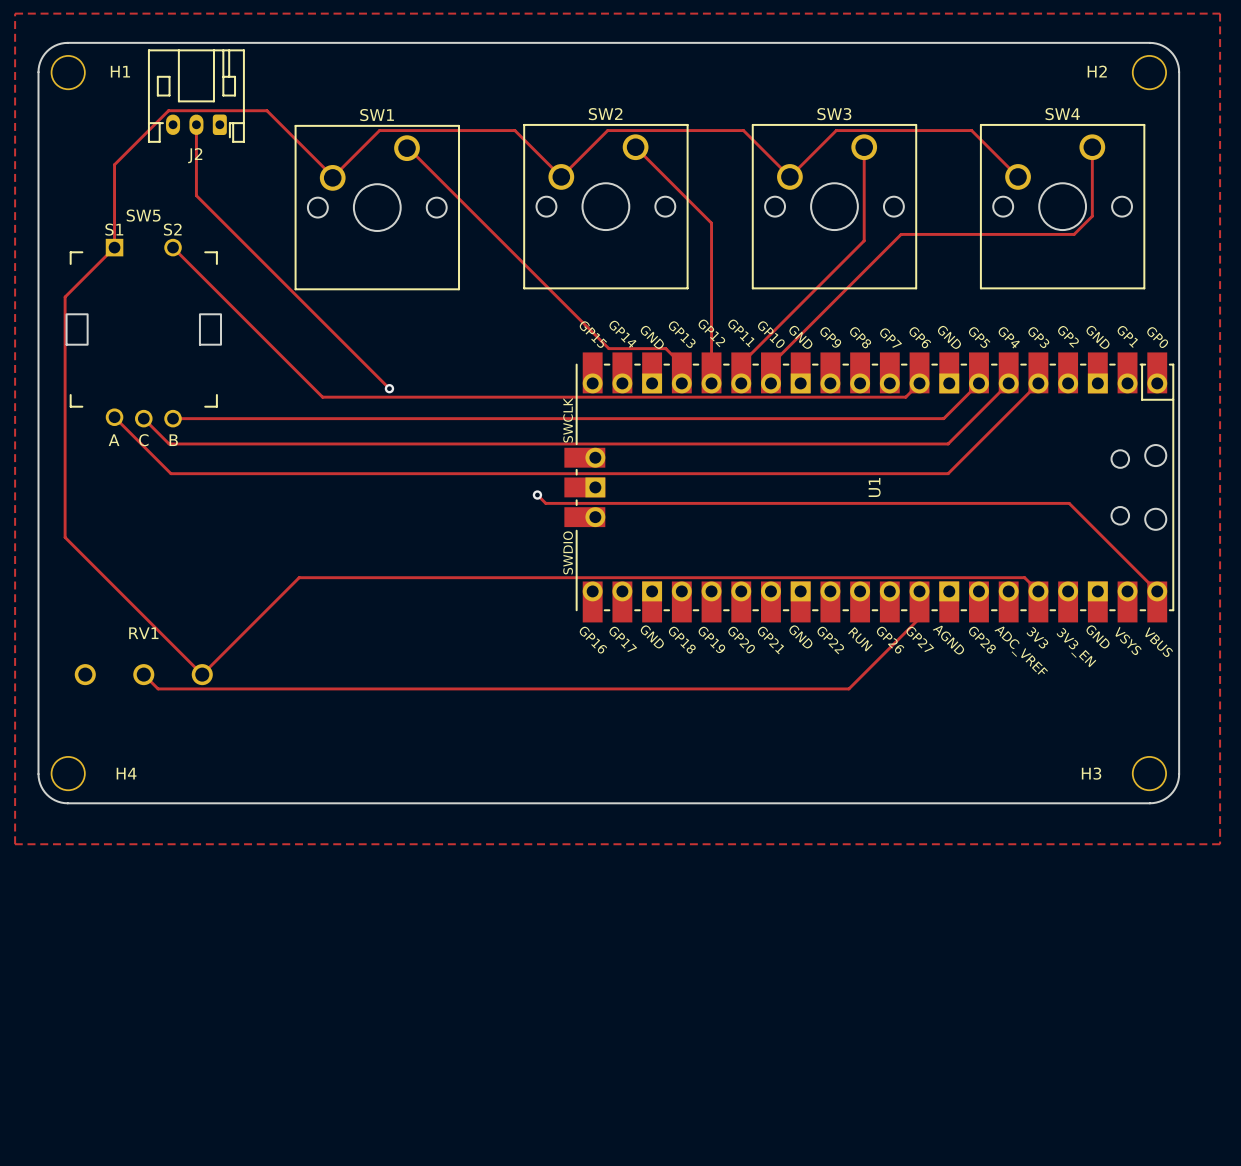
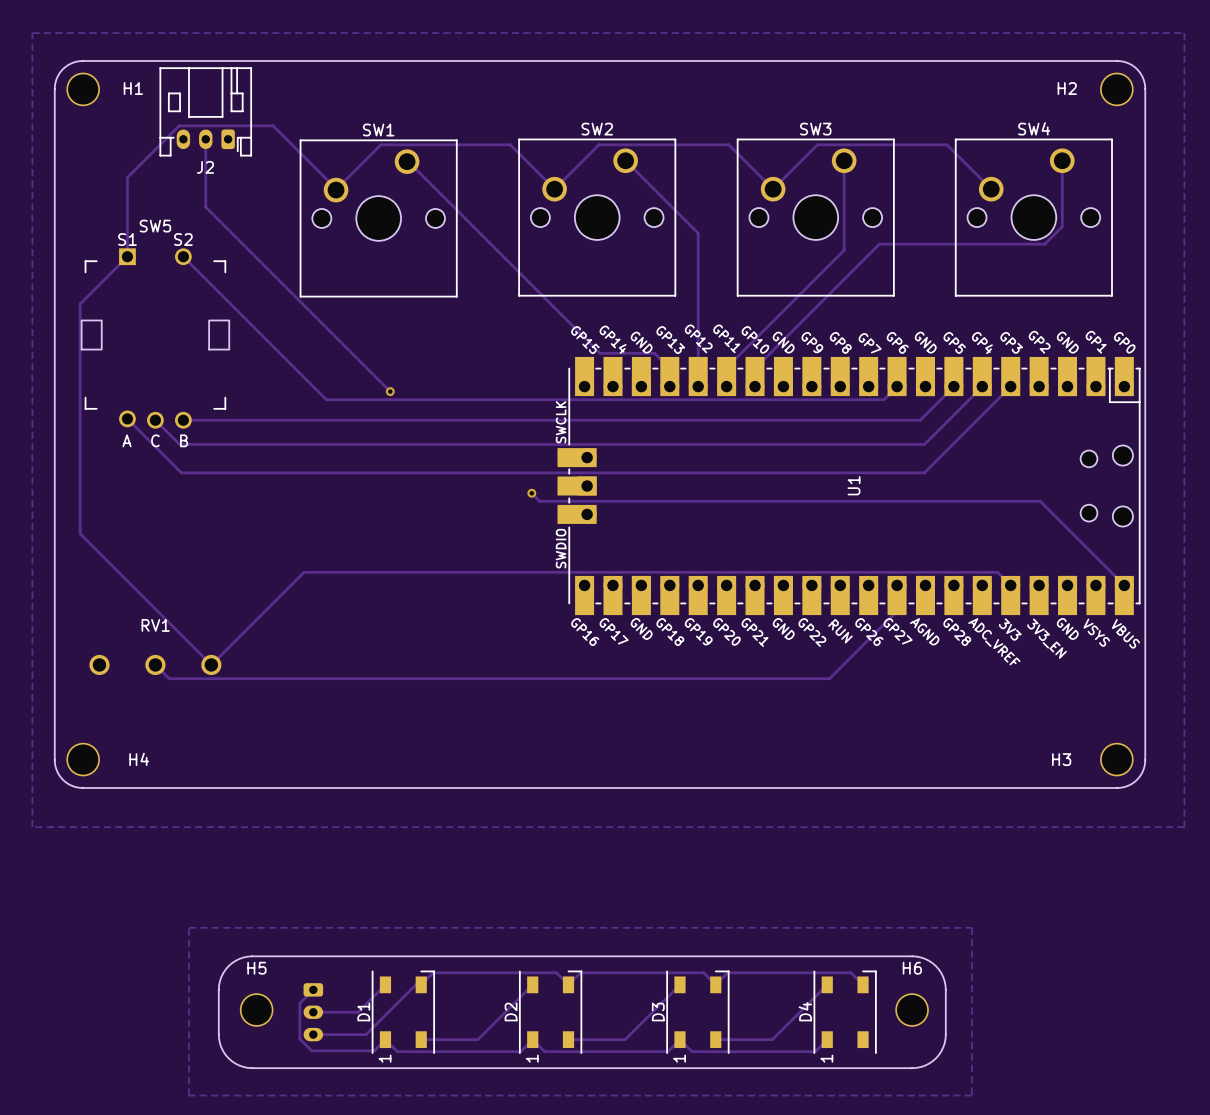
zone outline: none -> (188, 927) (188, 1095) (971, 1095) (971, 927) (188, 927)
board edge: none -> (252, 956) (916, 956) (932, 963) (943, 977) (945, 989) (945, 1038) (941, 1051) (932, 1061) (925, 1065) (912, 1068) (247, 1067) (231, 1061) (221, 1047) (218, 1034) (218, 989) (221, 977) (228, 966) (239, 958) (252, 956)
track: none -> (385, 984) (358, 1012) (313, 1012)
track: none -> (532, 984) (477, 1039) (421, 1039)
track: none -> (679, 984) (625, 1039) (568, 1039)
track: none -> (827, 984) (772, 1039) (715, 1039)
track: none -> (863, 984) (851, 972) (727, 972) (715, 984) (703, 972) (580, 972) (568, 984) (556, 972) (433, 972) (421, 984) (415, 984) (366, 1034) (313, 1034)
track: none -> (313, 989) (299, 1003) (299, 1038) (311, 1050) (374, 1050) (385, 1039) (397, 1051) (520, 1051) (532, 1039) (544, 1051) (667, 1051) (679, 1039) (692, 1051) (815, 1051) (827, 1039)
H5: none -> (256, 1010)
H6: none -> (912, 1010)
part: none -> (313, 1012)
D1: none -> (403, 1012)
D2: none -> (550, 1012)
D3: none -> (697, 1012)
D4: none -> (845, 1012)

